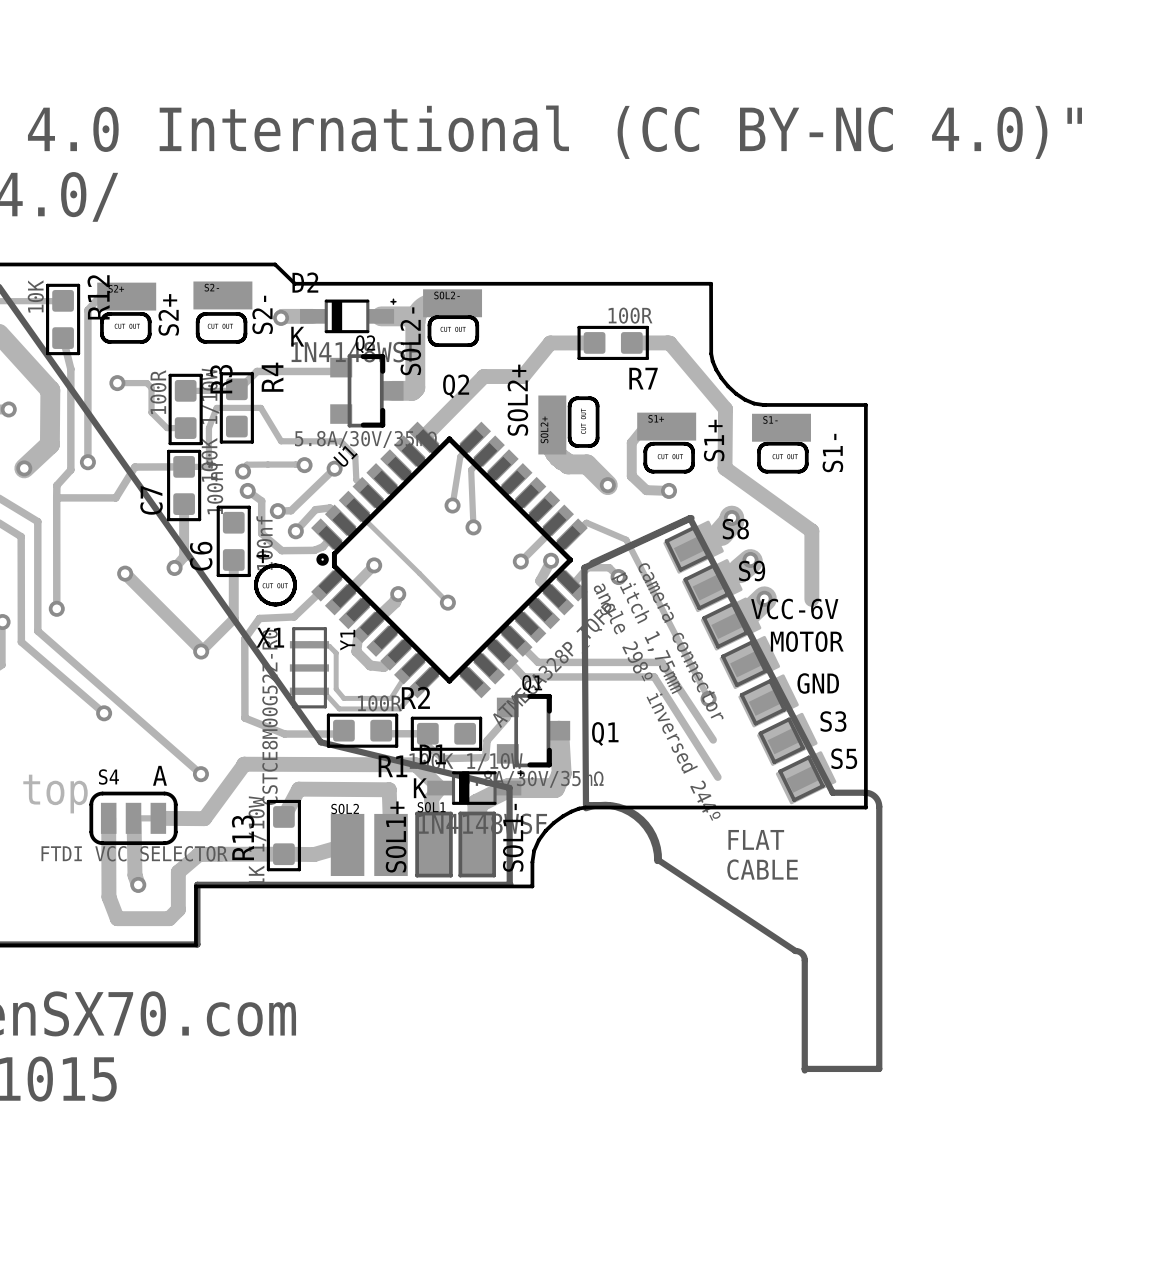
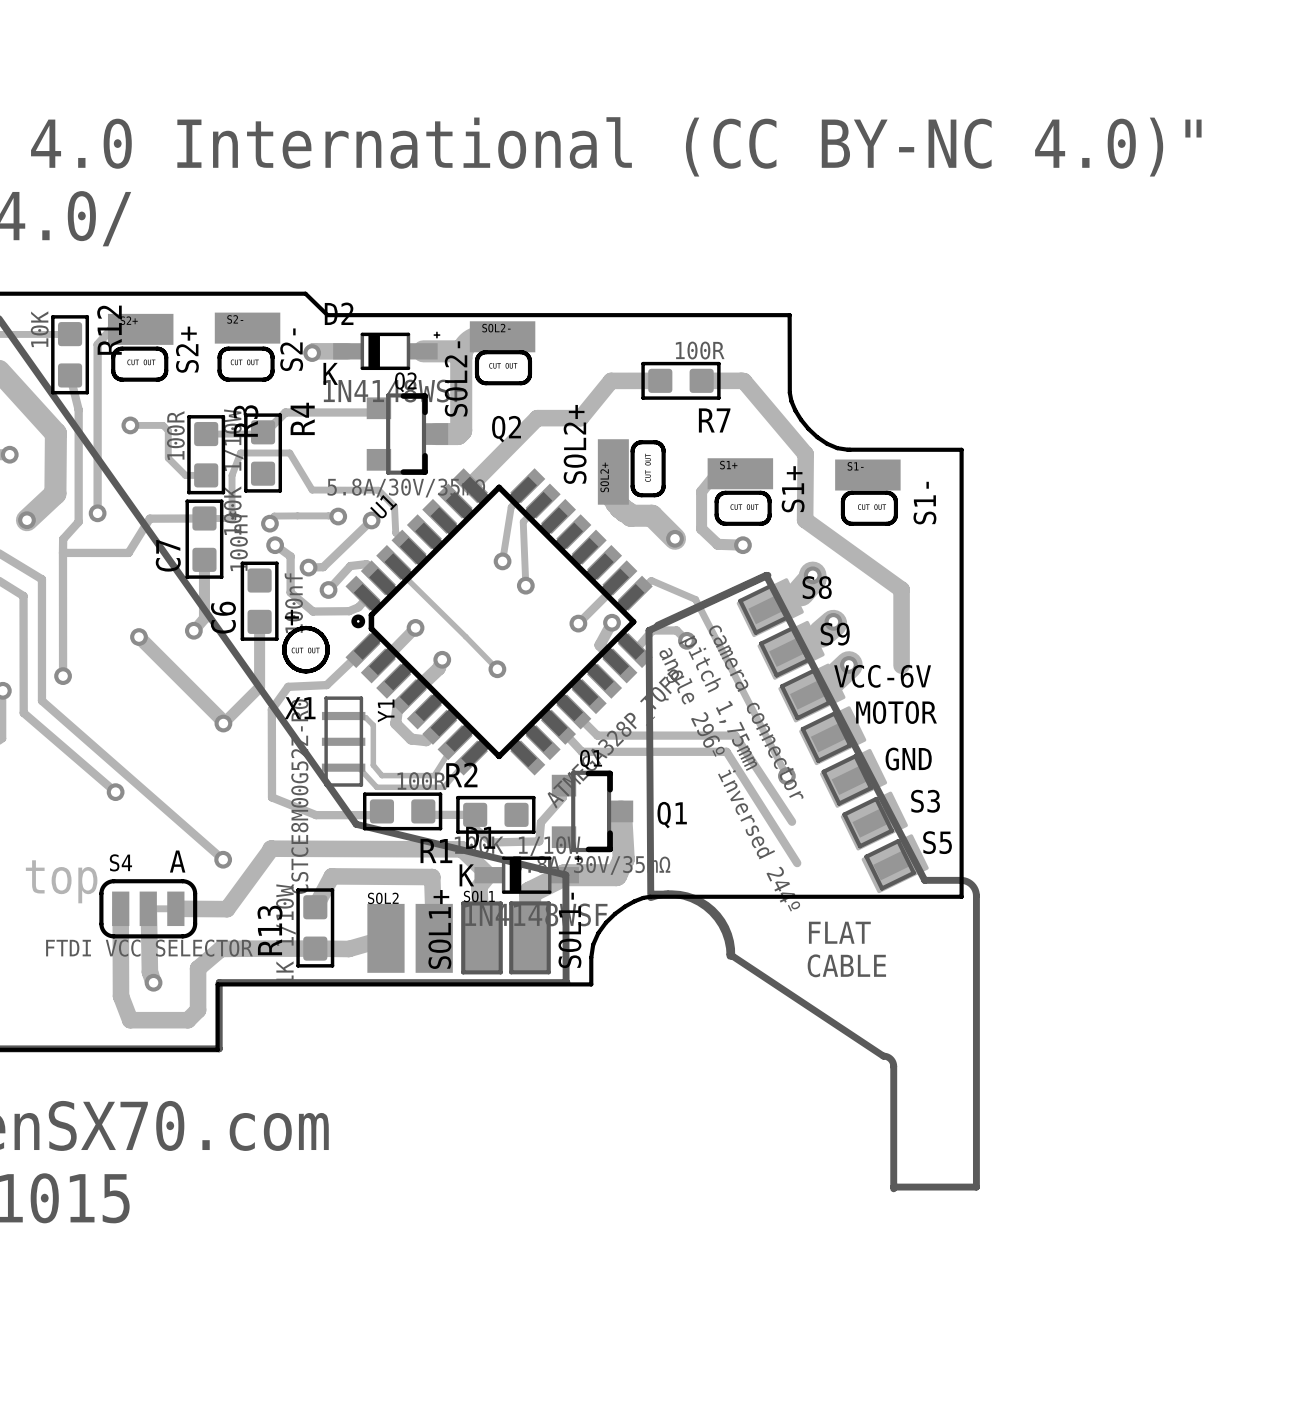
part text: angle 298º inversed 244º (657, 702) -> angle 296º inversed 244º (729, 779)

